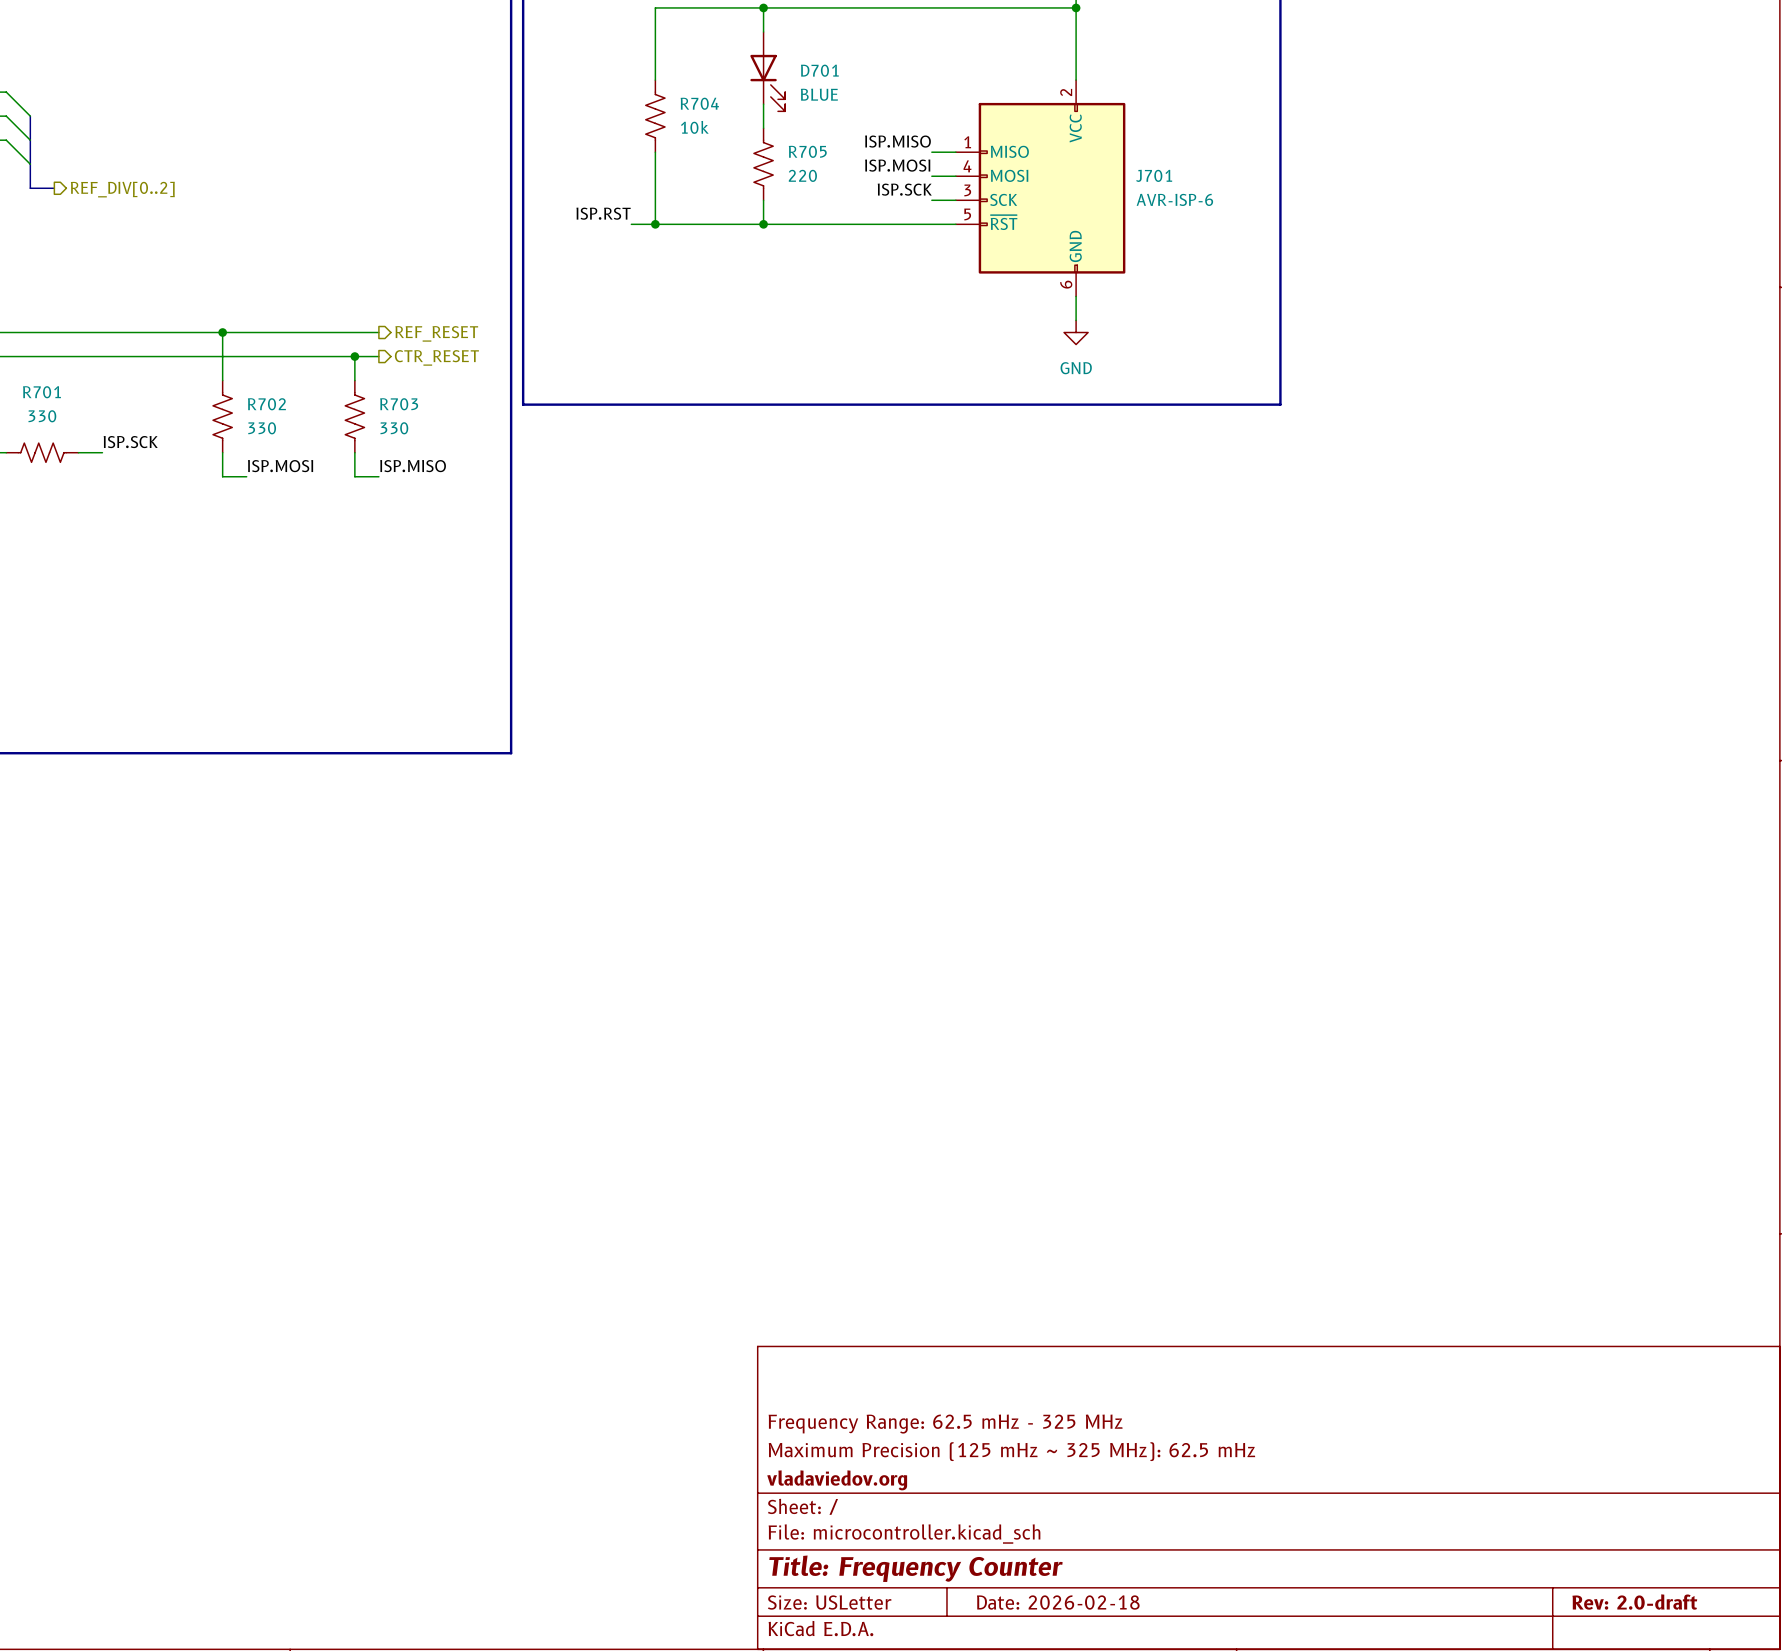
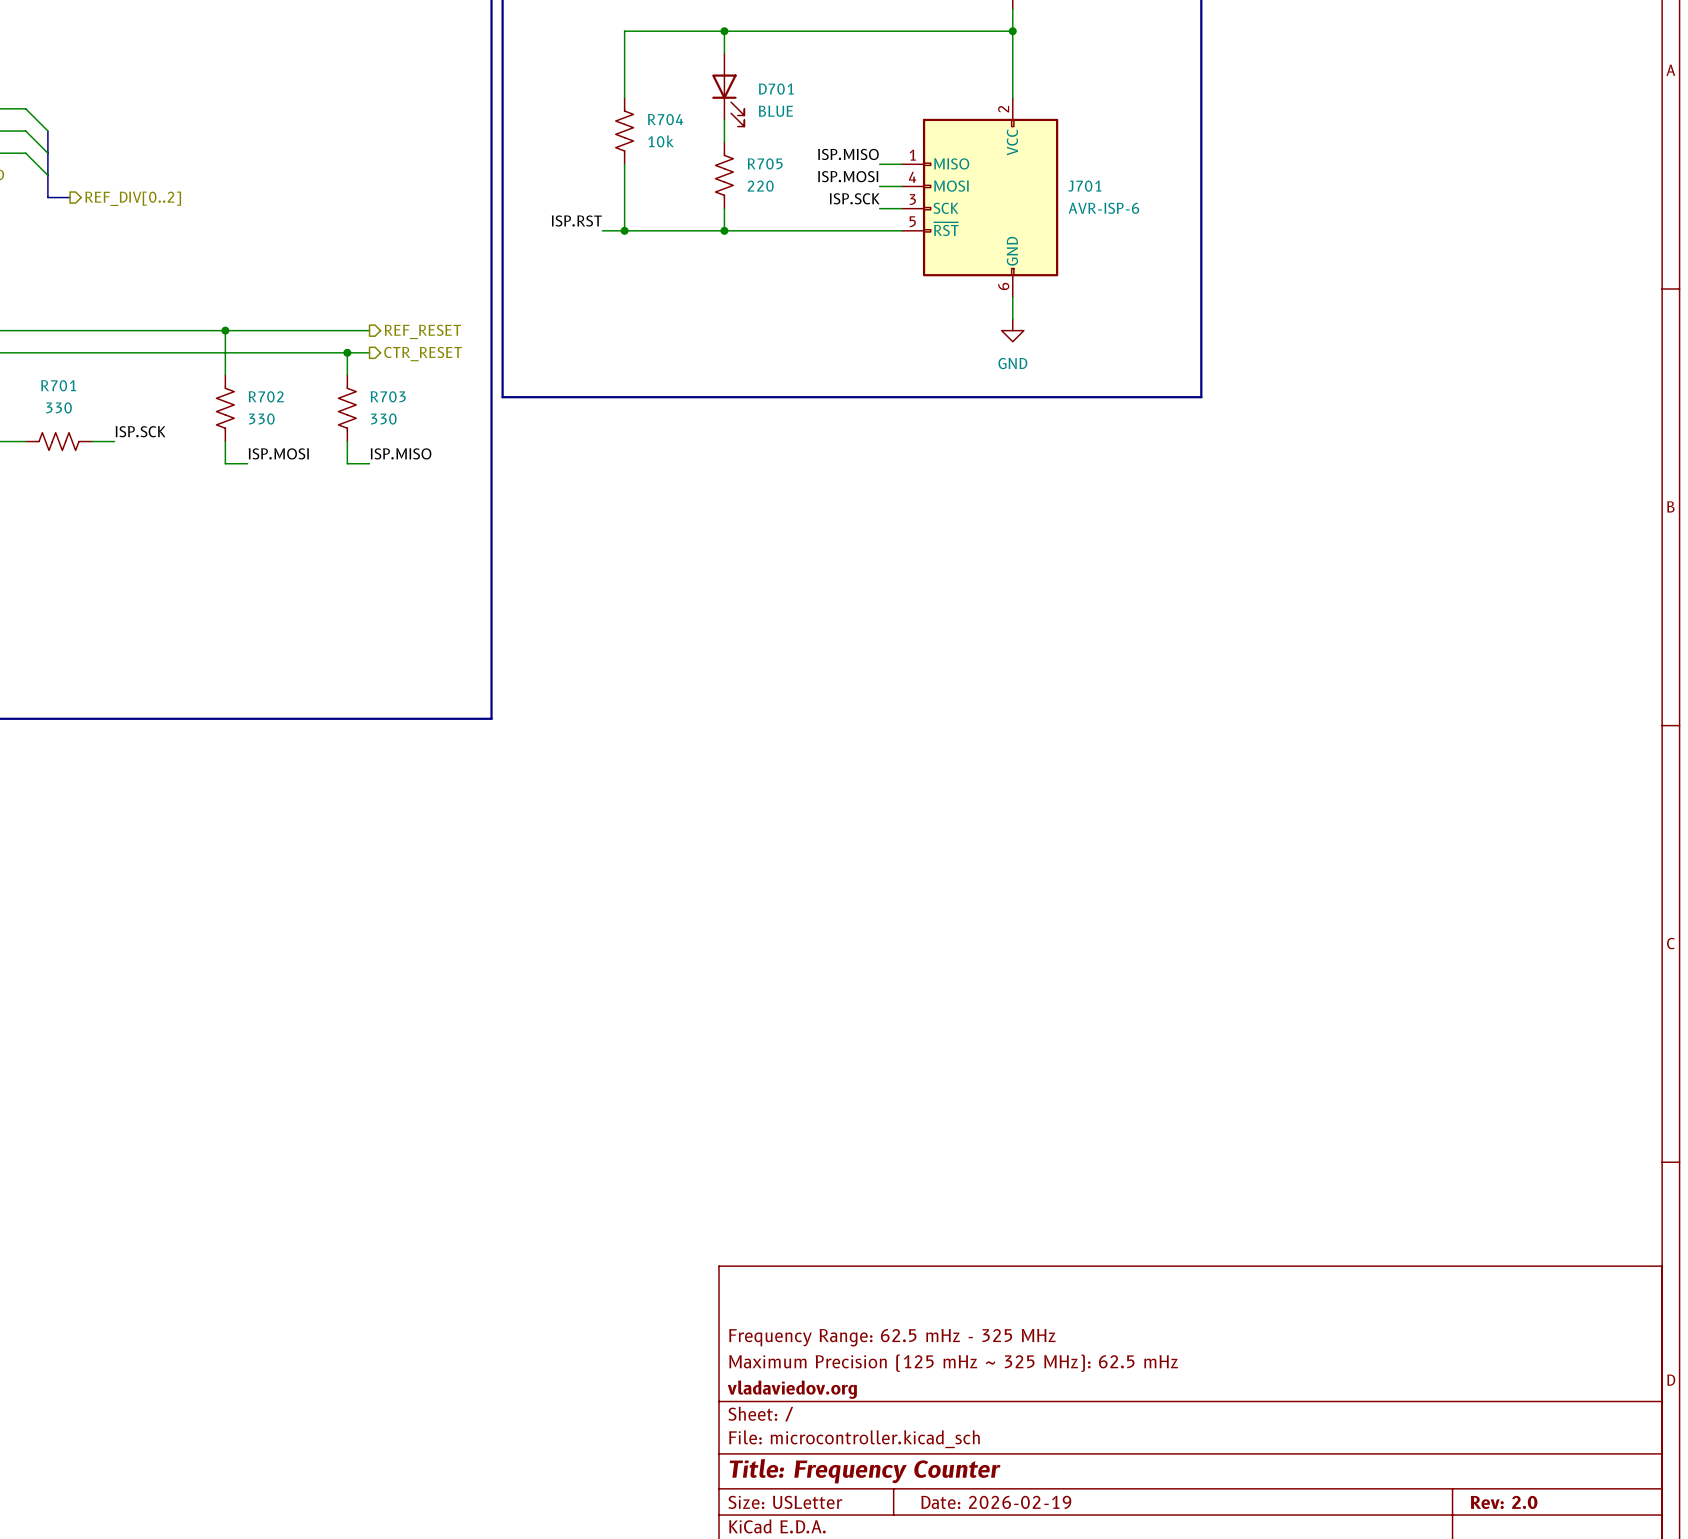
title block: Date: 2026-02-18 (1058, 1602) -> Date: 2026-02-19 (996, 1502)
title block: Rev: 2.0-draft (1634, 1602) -> Rev: 2.0 (1504, 1502)

